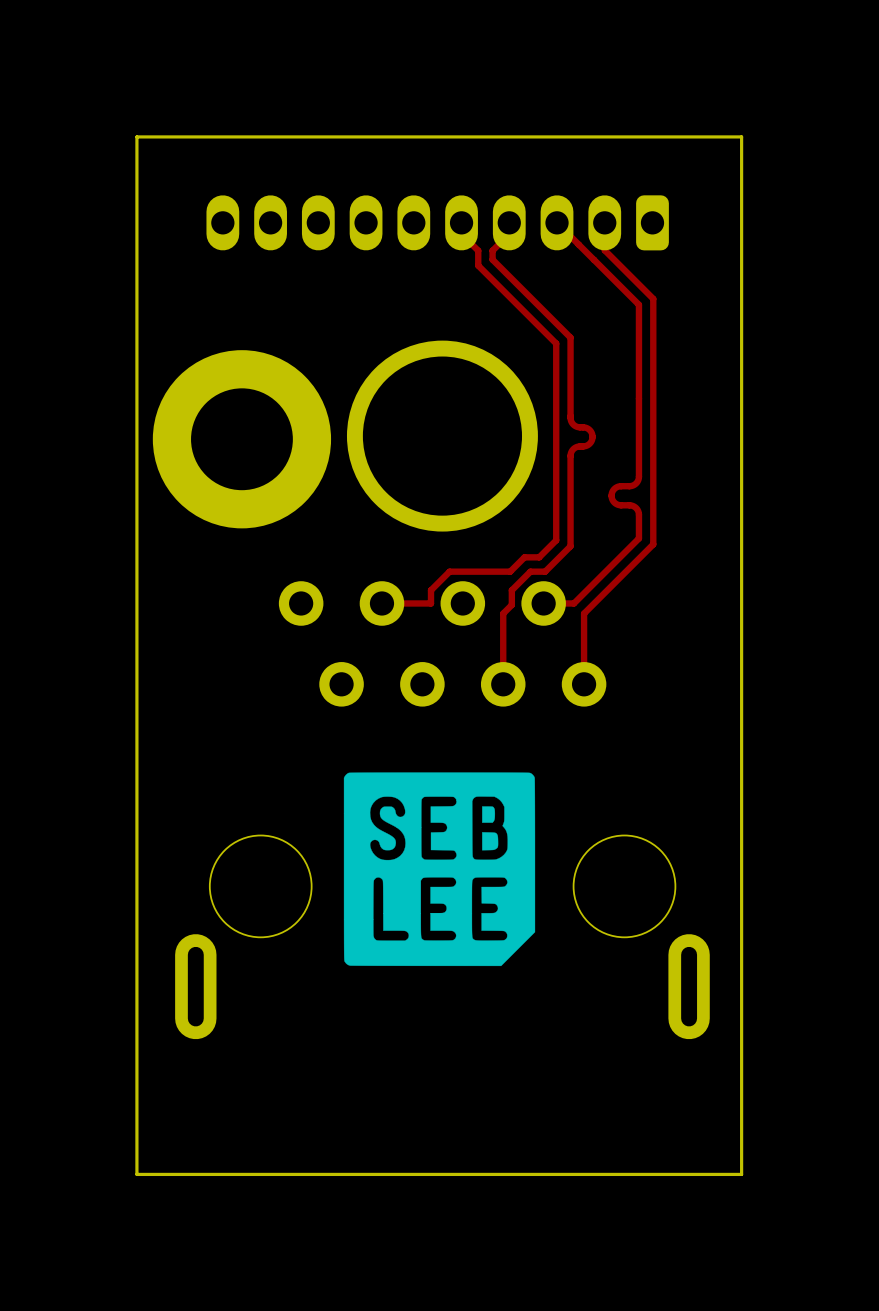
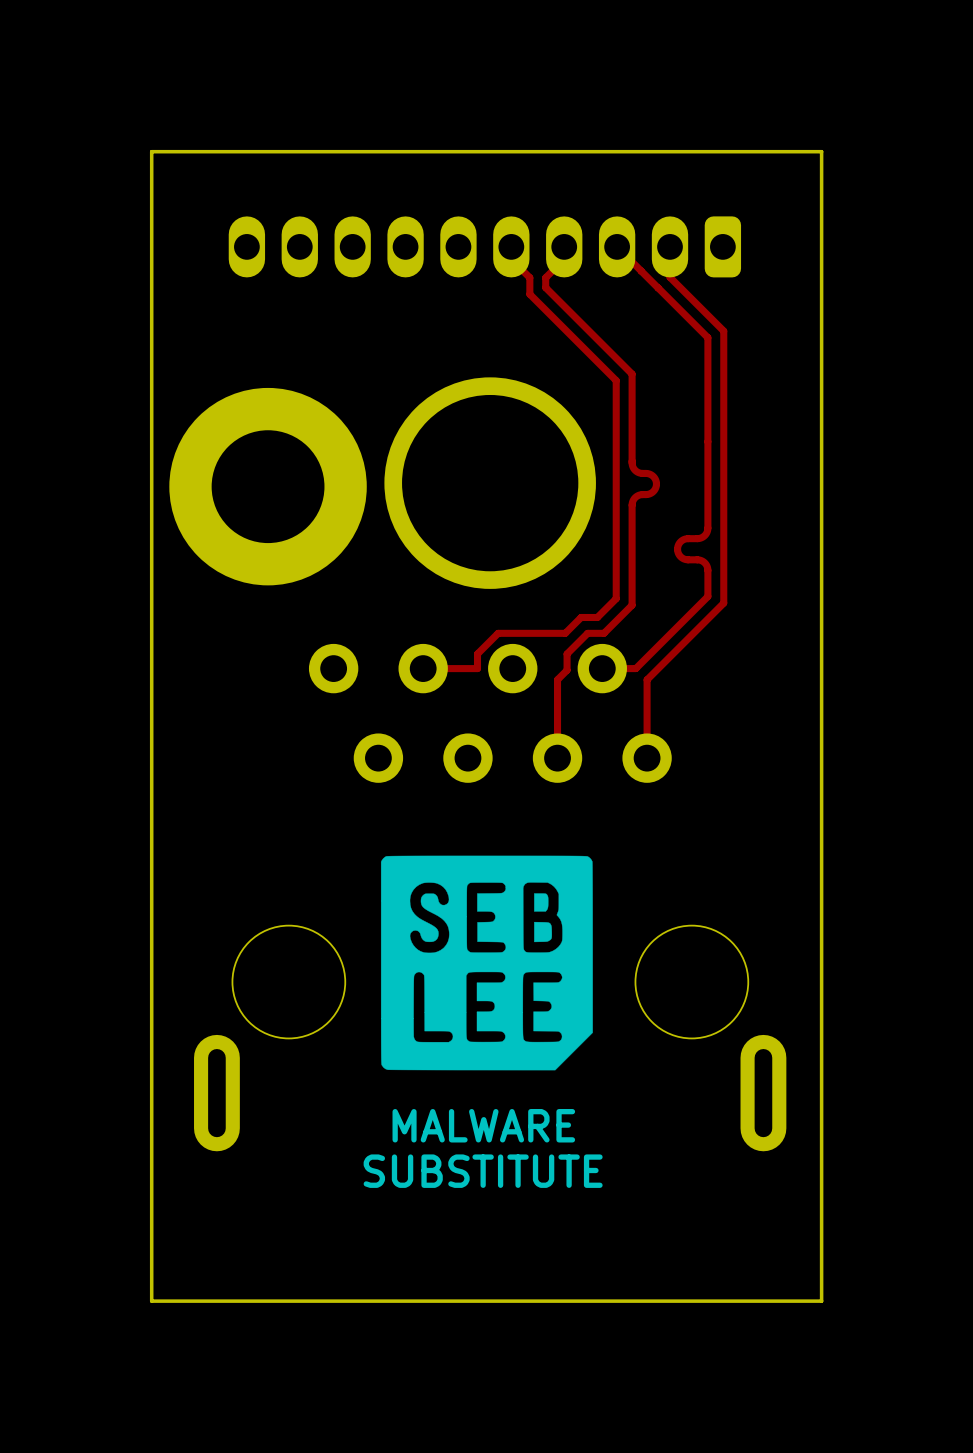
text: none -> MALWARE (483, 1125)
text: none -> SUBSTITUTE (483, 1171)

